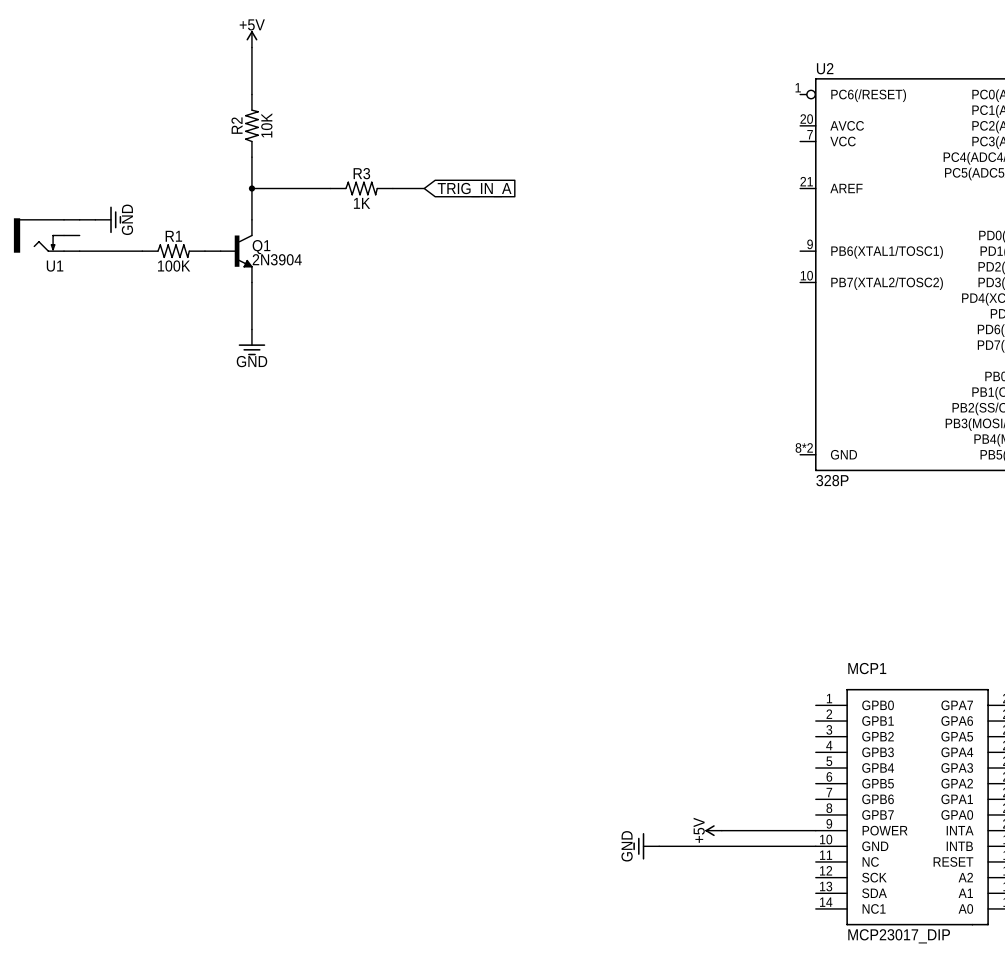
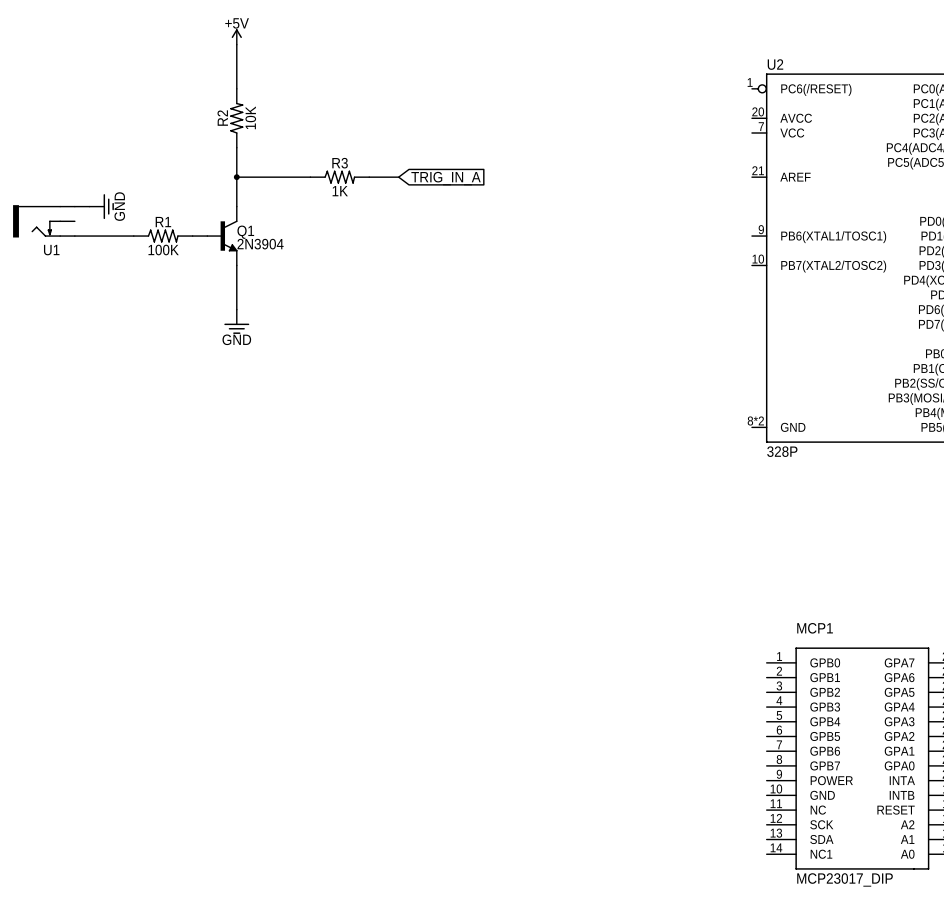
power symbol: +5V (713, 830) -> none
wire: (721, 830) (815, 830) -> none
power symbol: GND (646, 846) -> none
wire: (659, 846) (815, 846) -> none

